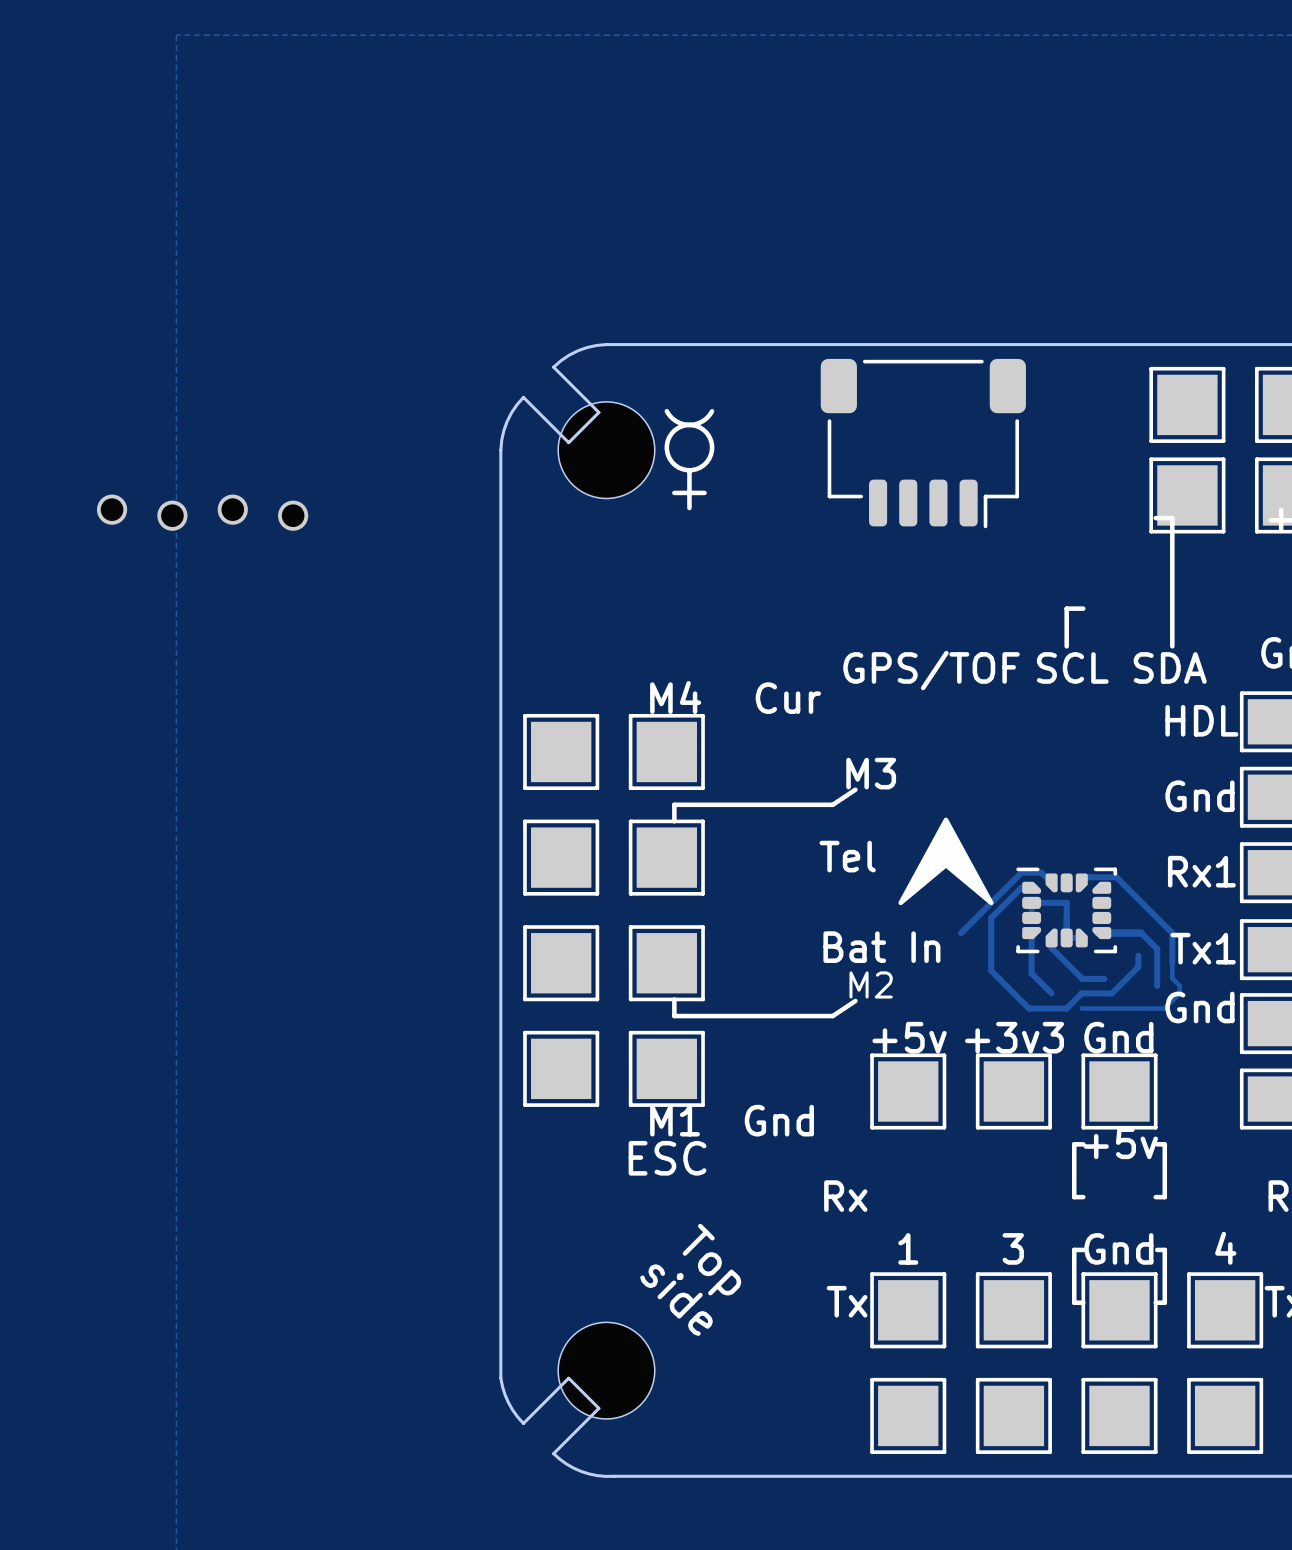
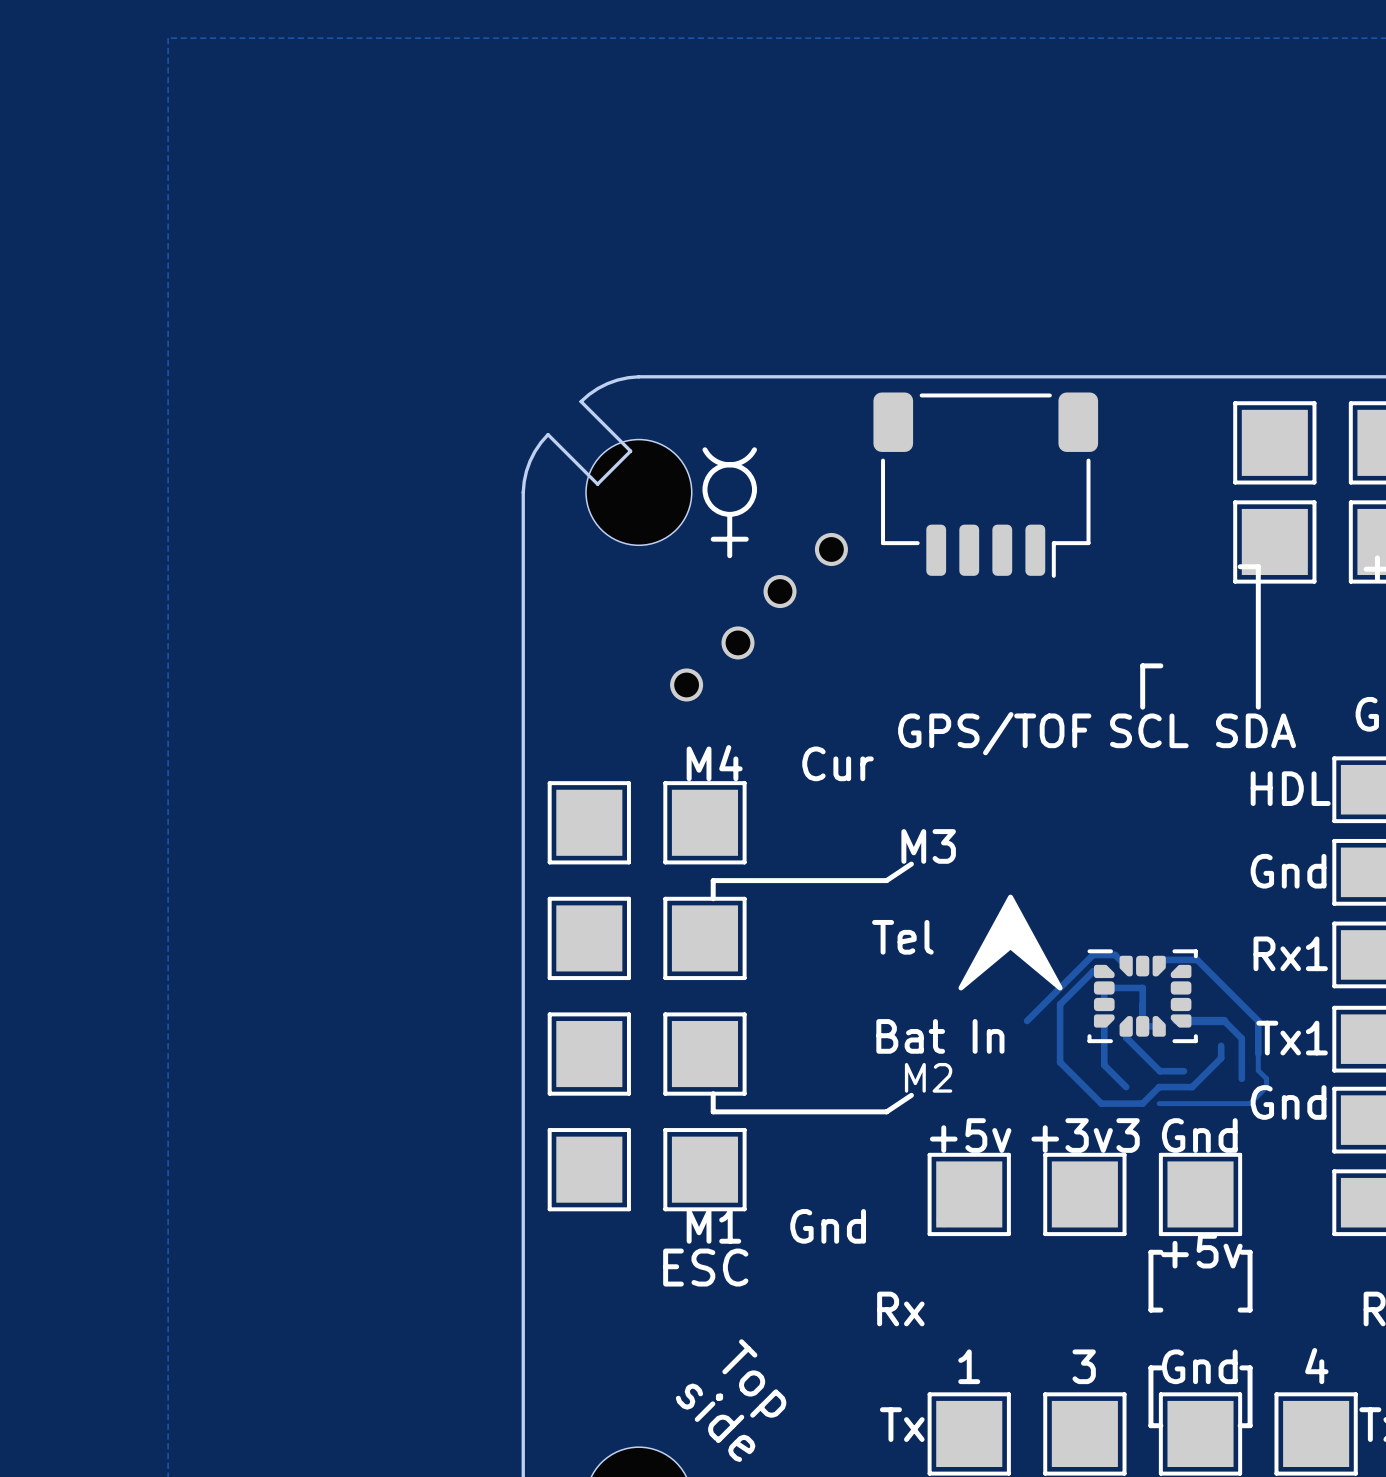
part: (202, 512) -> none
part: none -> (759, 617)

